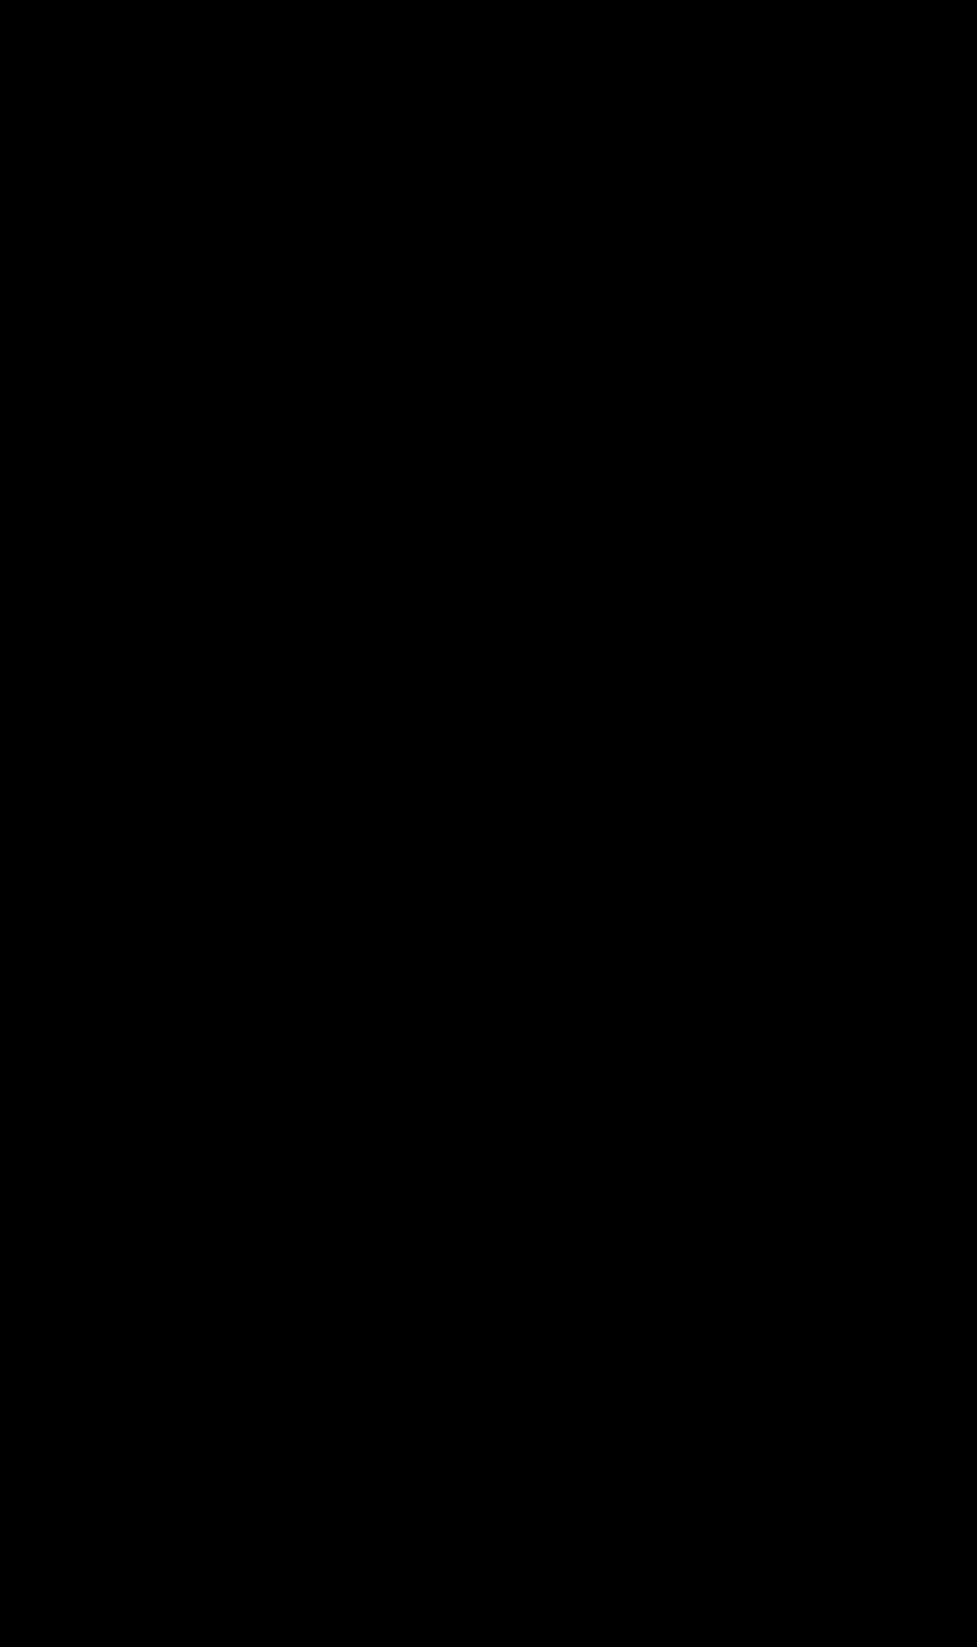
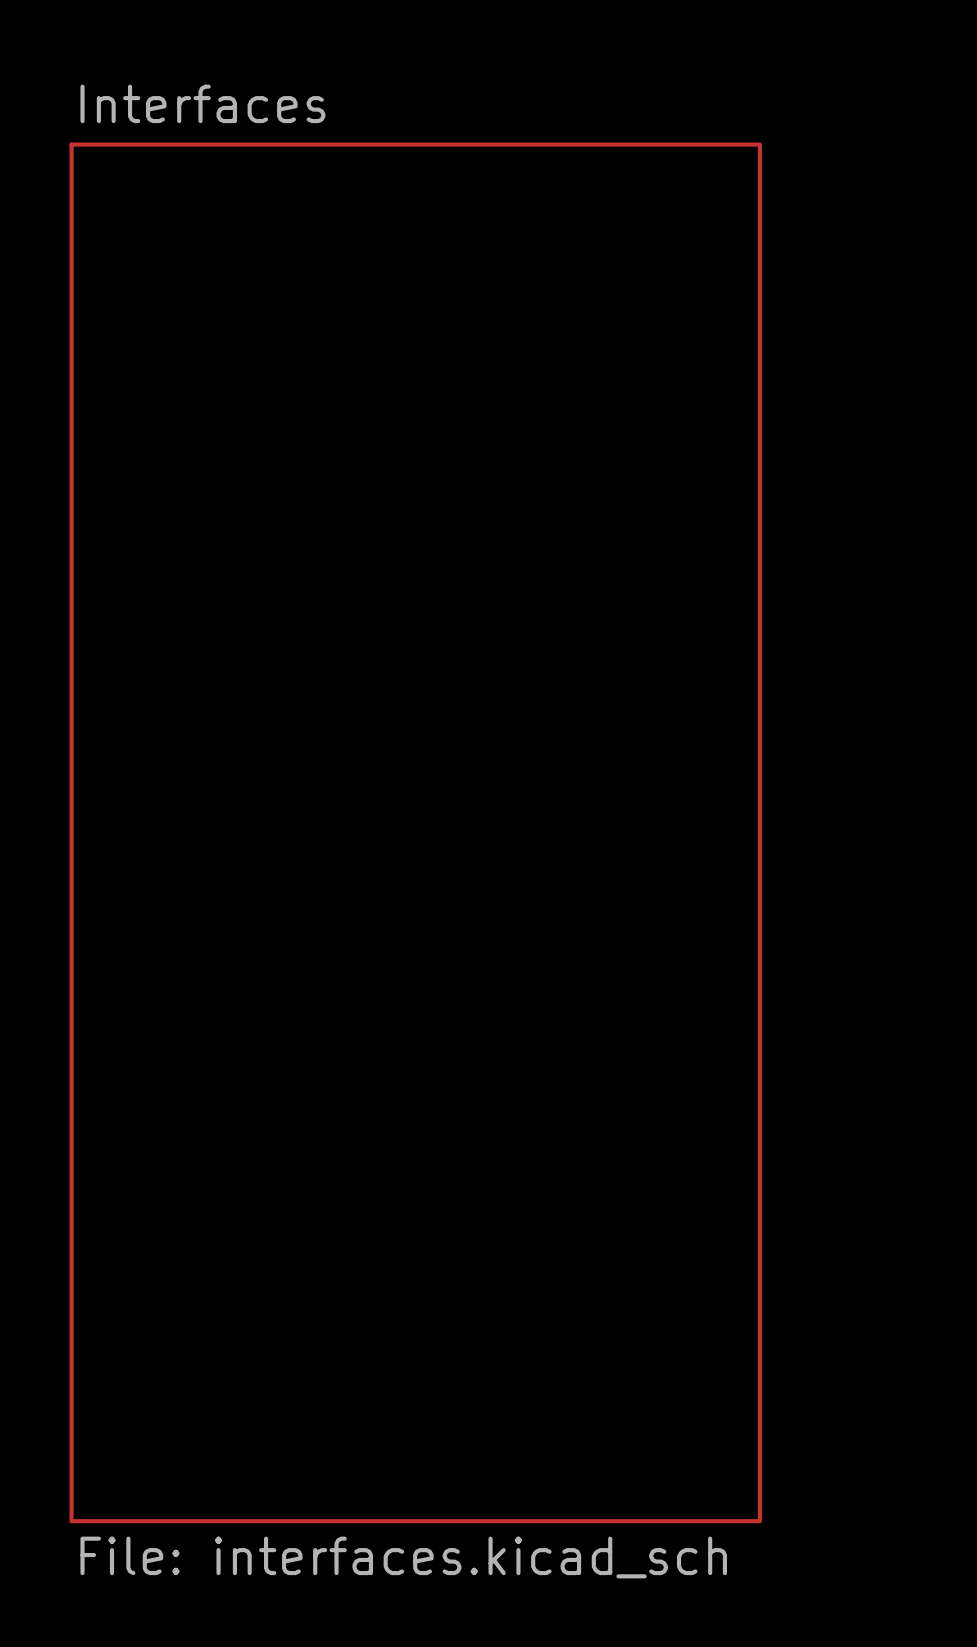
sheet Interfaces: none -> File: interfaces.kicad_sch (415, 832)

